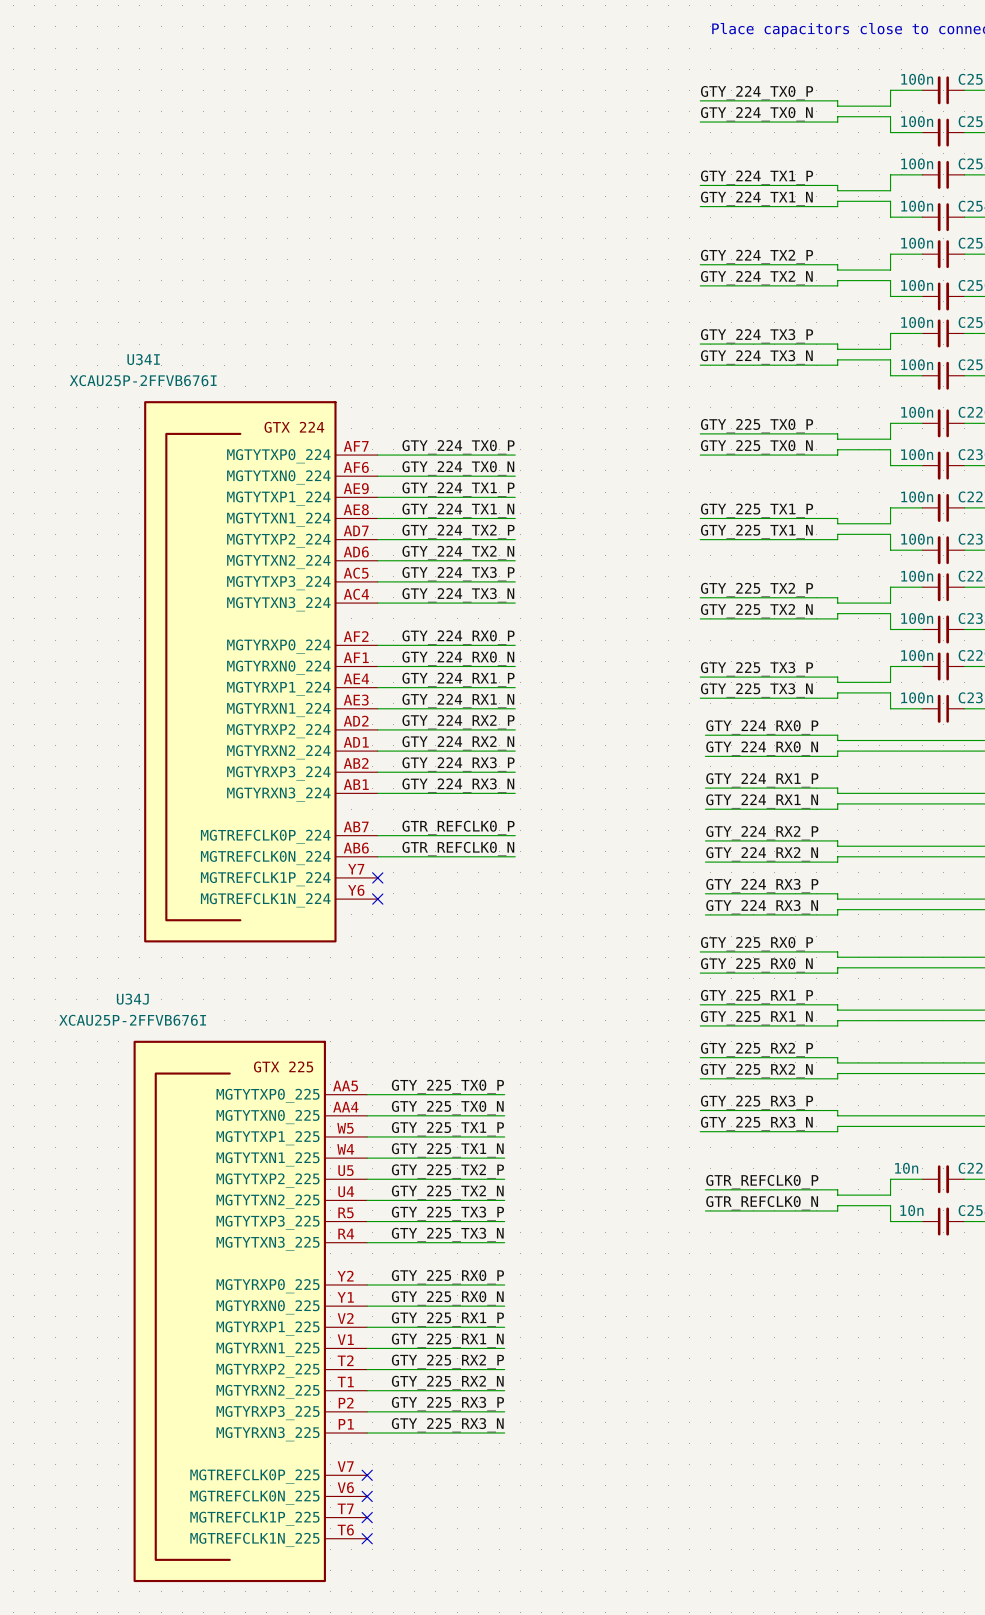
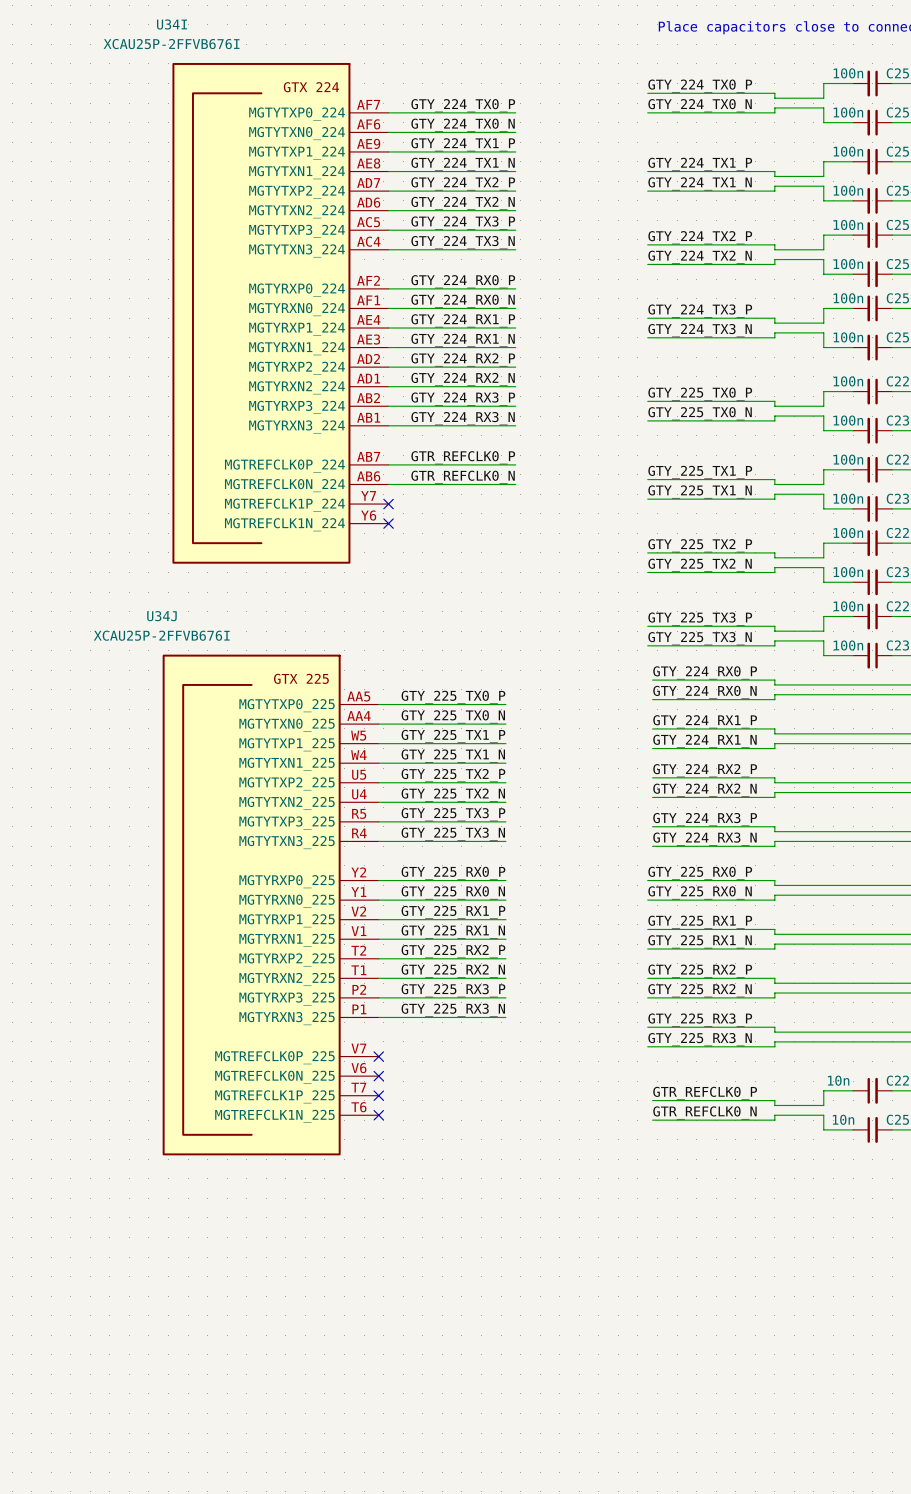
label: none -> GTY_224_TX0_P (463, 105)
wire: none -> (388, 112) (515, 112)
label: none -> GTY_224_TX0_N (463, 125)
wire: none -> (388, 132) (515, 132)
label: none -> GTY_224_TX1_P (463, 144)
wire: none -> (388, 151) (515, 151)
label: none -> GTY_224_TX1_N (463, 164)
wire: none -> (388, 171) (515, 171)
label: none -> GTY_224_TX2_P (463, 183)
wire: none -> (388, 191) (515, 191)
label: none -> GTY_224_TX2_N (463, 203)
wire: none -> (388, 210) (515, 210)
label: none -> GTY_224_TX3_P (463, 222)
wire: none -> (388, 230) (515, 230)
label: none -> GTY_224_TX3_N (463, 242)
wire: none -> (388, 249) (515, 249)
label: none -> GTY_224_RX0_P (463, 281)
label: none -> GTY_224_RX0_N (463, 301)
label: none -> GTY_224_RX1_P (463, 320)
label: none -> GTY_224_RX1_N (463, 340)
label: none -> GTY_224_RX2_P (463, 359)
label: none -> GTY_224_RX2_N (463, 379)
label: none -> GTY_224_RX3_P (463, 399)
label: GTY_224_TX0_P (458, 447) -> none
label: none -> GTY_224_RX3_N (463, 418)
wire: (377, 455) (515, 455) -> (388, 288) (515, 288)
label: GTY_224_TX0_N (458, 468) -> none
wire: (377, 476) (515, 476) -> (388, 308) (515, 308)
label: GTY_224_TX1_P (458, 489) -> none
label: none -> GTR_REFCLK0_P (463, 457)
wire: (377, 497) (515, 497) -> (388, 328) (515, 328)
label: GTY_224_TX1_N (458, 510) -> none
label: none -> GTR_REFCLK0_N (463, 477)
wire: (377, 518) (515, 518) -> (388, 347) (515, 347)
label: GTY_224_TX2_P (458, 531) -> none
wire: (377, 539) (515, 539) -> (388, 367) (515, 367)
no-connect mark: none -> (388, 504)
label: GTY_224_TX2_N (458, 552) -> none
wire: (377, 560) (515, 560) -> (388, 386) (515, 386)
no-connect mark: none -> (388, 523)
label: GTY_224_TX3_P (458, 574) -> none
wire: (377, 581) (515, 581) -> (388, 406) (515, 406)
label: GTY_224_TX3_N (458, 595) -> none
wire: (377, 603) (515, 603) -> (388, 425) (515, 425)
label: GTY_224_RX0_P (458, 637) -> none
wire: (377, 645) (515, 645) -> (388, 464) (515, 464)
label: GTY_224_RX0_N (458, 658) -> none
wire: (377, 666) (515, 666) -> (388, 484) (515, 484)
U34I position: (260, 671) -> (280, 313)
label: GTY_224_RX1_P (458, 679) -> none
wire: (377, 687) (515, 687) -> (378, 821) (505, 821)
label: GTY_224_RX1_N (458, 700) -> none
wire: (377, 708) (515, 708) -> (378, 841) (505, 841)
label: GTY_224_RX2_P (458, 722) -> none
wire: (377, 729) (515, 729) -> (378, 782) (505, 782)
label: GTY_224_RX2_N (458, 743) -> none
wire: (377, 751) (515, 751) -> (378, 802) (505, 802)
label: none -> GTY_225_TX0_P (453, 697)
label: GTY_224_RX3_P (458, 764) -> none
wire: (377, 772) (515, 772) -> (378, 763) (505, 763)
label: none -> GTY_225_TX0_N (453, 716)
label: GTY_224_RX3_N (458, 785) -> none
wire: (377, 793) (515, 793) -> (378, 743) (505, 743)
label: none -> GTY_225_TX1_P (453, 736)
label: none -> GTY_225_TX1_N (453, 755)
label: GTR_REFCLK0_P (458, 827) -> none
wire: (377, 835) (515, 835) -> (378, 724) (505, 724)
label: none -> GTY_225_TX2_P (453, 775)
label: GTR_REFCLK0_N (458, 848) -> none
wire: (377, 856) (515, 856) -> (378, 704) (505, 704)
label: none -> GTY_225_TX2_N (453, 795)
no-connect mark: (377, 877) -> none
label: none -> GTY_225_TX3_P (453, 814)
no-connect mark: (377, 899) -> none
label: none -> GTY_225_TX3_N (453, 834)
label: none -> GTY_225_RX0_P (453, 873)
label: none -> GTY_225_RX0_N (453, 892)
label: none -> GTY_225_RX1_P (453, 912)
label: none -> GTY_225_RX1_N (453, 931)
label: none -> GTY_225_RX2_P (453, 951)
label: none -> GTY_225_RX2_N (453, 971)
label: none -> GTY_225_RX3_P (453, 990)
label: GTY_225_TX0_P (447, 1086) -> none
label: none -> GTY_225_RX3_N (453, 1010)
wire: (367, 1094) (504, 1094) -> (378, 880) (505, 880)
label: GTY_225_TX0_N (447, 1108) -> none
wire: (367, 1115) (504, 1115) -> (378, 900) (505, 900)
label: GTY_225_TX1_P (447, 1129) -> none
wire: (367, 1136) (504, 1136) -> (378, 919) (505, 919)
no-connect mark: none -> (378, 1056)
label: GTY_225_TX1_N (447, 1150) -> none
wire: (367, 1158) (504, 1158) -> (378, 939) (505, 939)
no-connect mark: none -> (378, 1076)
label: GTY_225_TX2_P (447, 1171) -> none
wire: (367, 1179) (504, 1179) -> (378, 958) (505, 958)
no-connect mark: none -> (378, 1095)
label: GTY_225_TX2_N (447, 1192) -> none
wire: (367, 1200) (504, 1200) -> (378, 978) (505, 978)
no-connect mark: none -> (378, 1115)
label: GTY_225_TX3_P (447, 1213) -> none
wire: (367, 1221) (504, 1221) -> (378, 997) (505, 997)
label: GTY_225_TX3_N (447, 1234) -> none
wire: (367, 1242) (504, 1242) -> (378, 1017) (505, 1017)
label: GTY_225_RX0_P (447, 1277) -> none
wire: (367, 1284) (504, 1284) -> none
label: GTY_225_RX0_N (447, 1298) -> none
wire: (367, 1306) (504, 1306) -> none
U34J position: (250, 1311) -> (270, 905)
label: GTY_225_RX1_P (447, 1319) -> none
wire: (367, 1327) (504, 1327) -> none
label: GTY_225_RX1_N (447, 1340) -> none
wire: (367, 1348) (504, 1348) -> none
label: GTY_225_RX2_P (447, 1361) -> none
wire: (367, 1369) (504, 1369) -> none
label: GTY_225_RX2_N (447, 1382) -> none
wire: (367, 1390) (504, 1390) -> none
label: GTY_225_RX3_P (447, 1404) -> none
wire: (367, 1411) (504, 1411) -> none
label: GTY_225_RX3_N (447, 1425) -> none
wire: (367, 1433) (504, 1433) -> none
no-connect mark: (367, 1475) -> none
no-connect mark: (367, 1496) -> none
no-connect mark: (367, 1517) -> none
no-connect mark: (367, 1538) -> none

